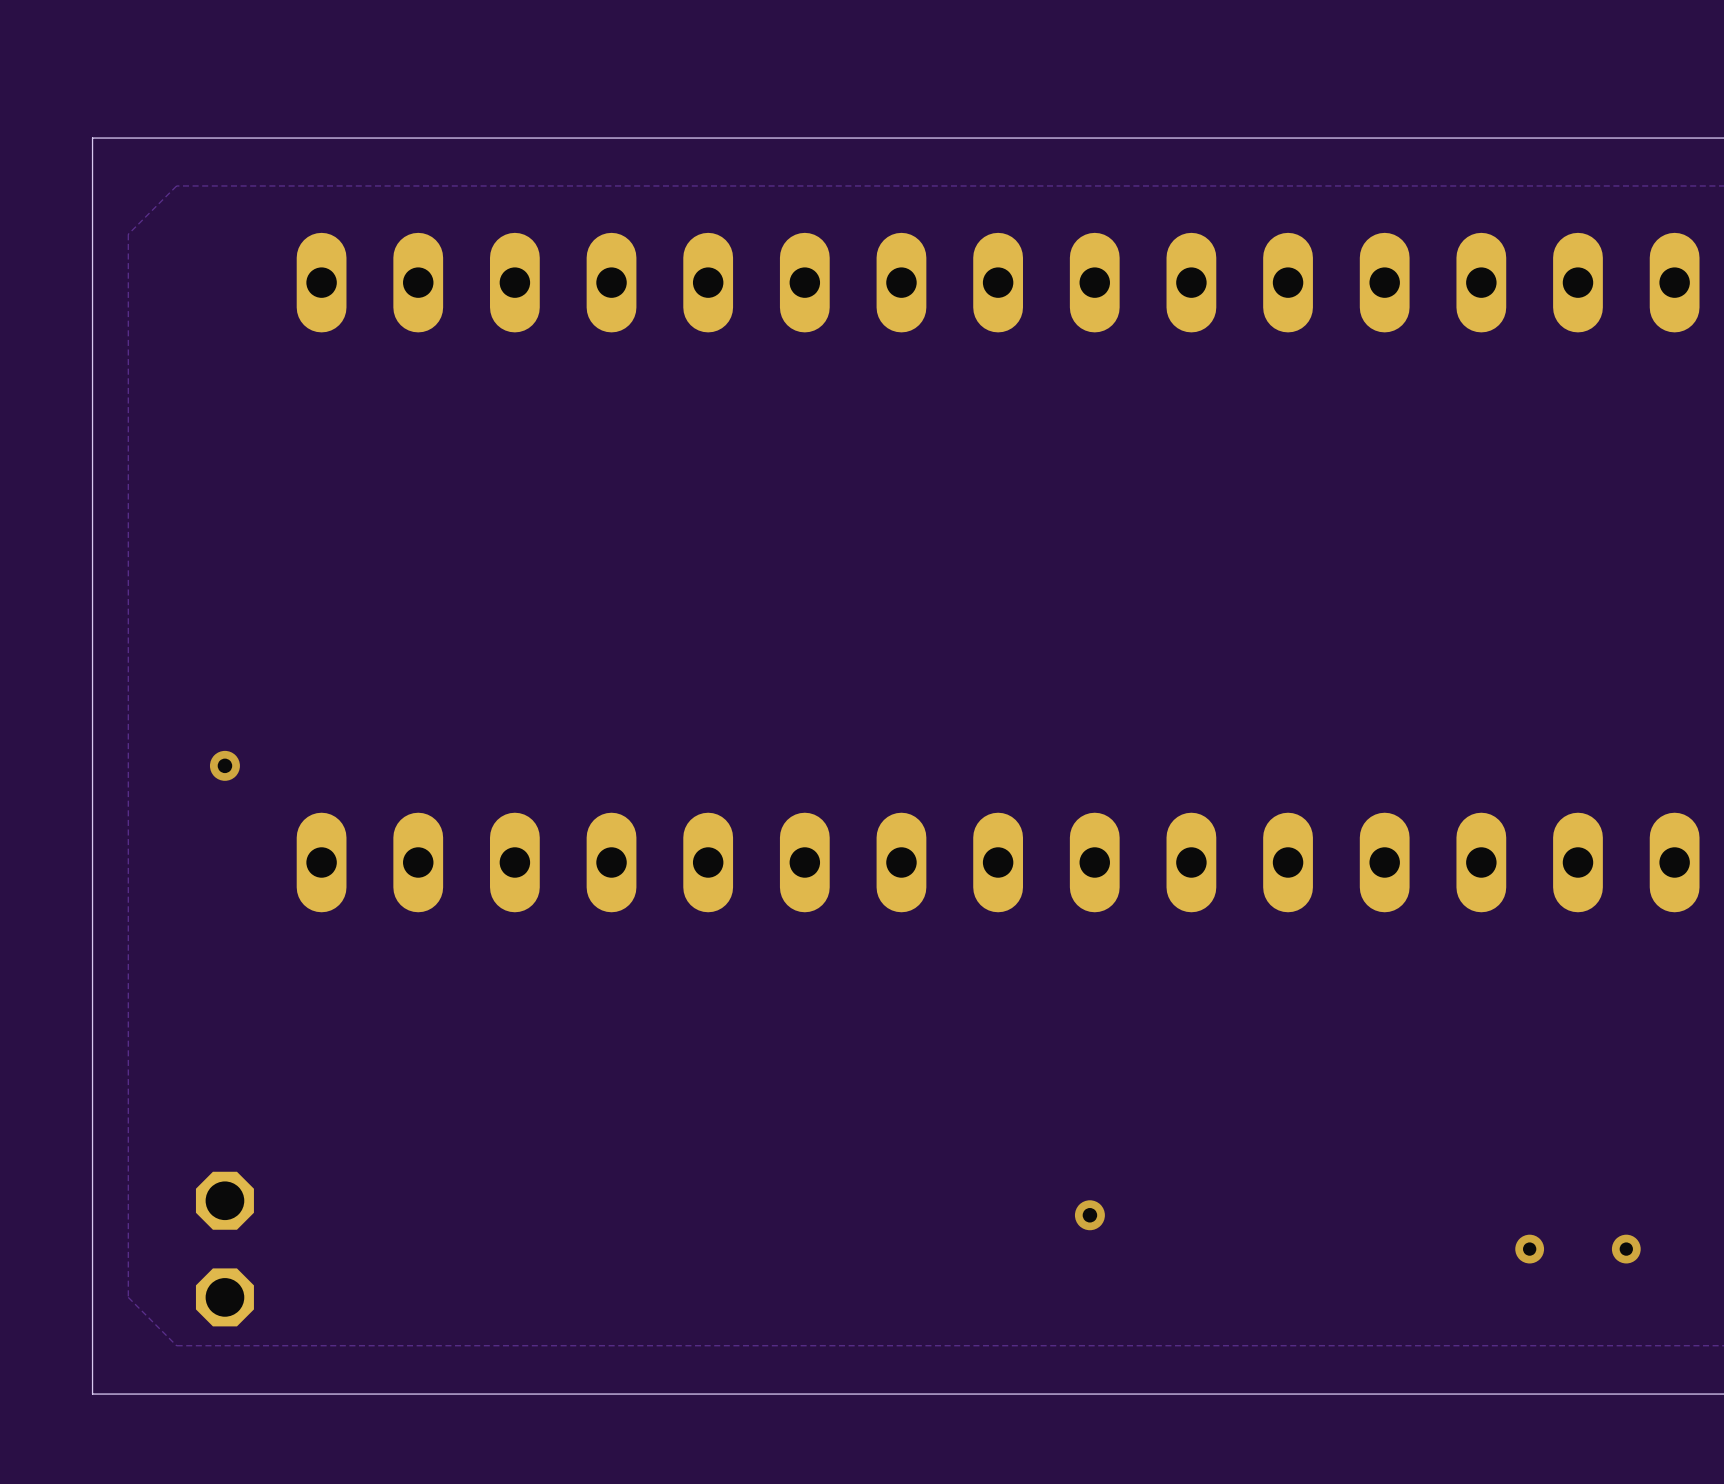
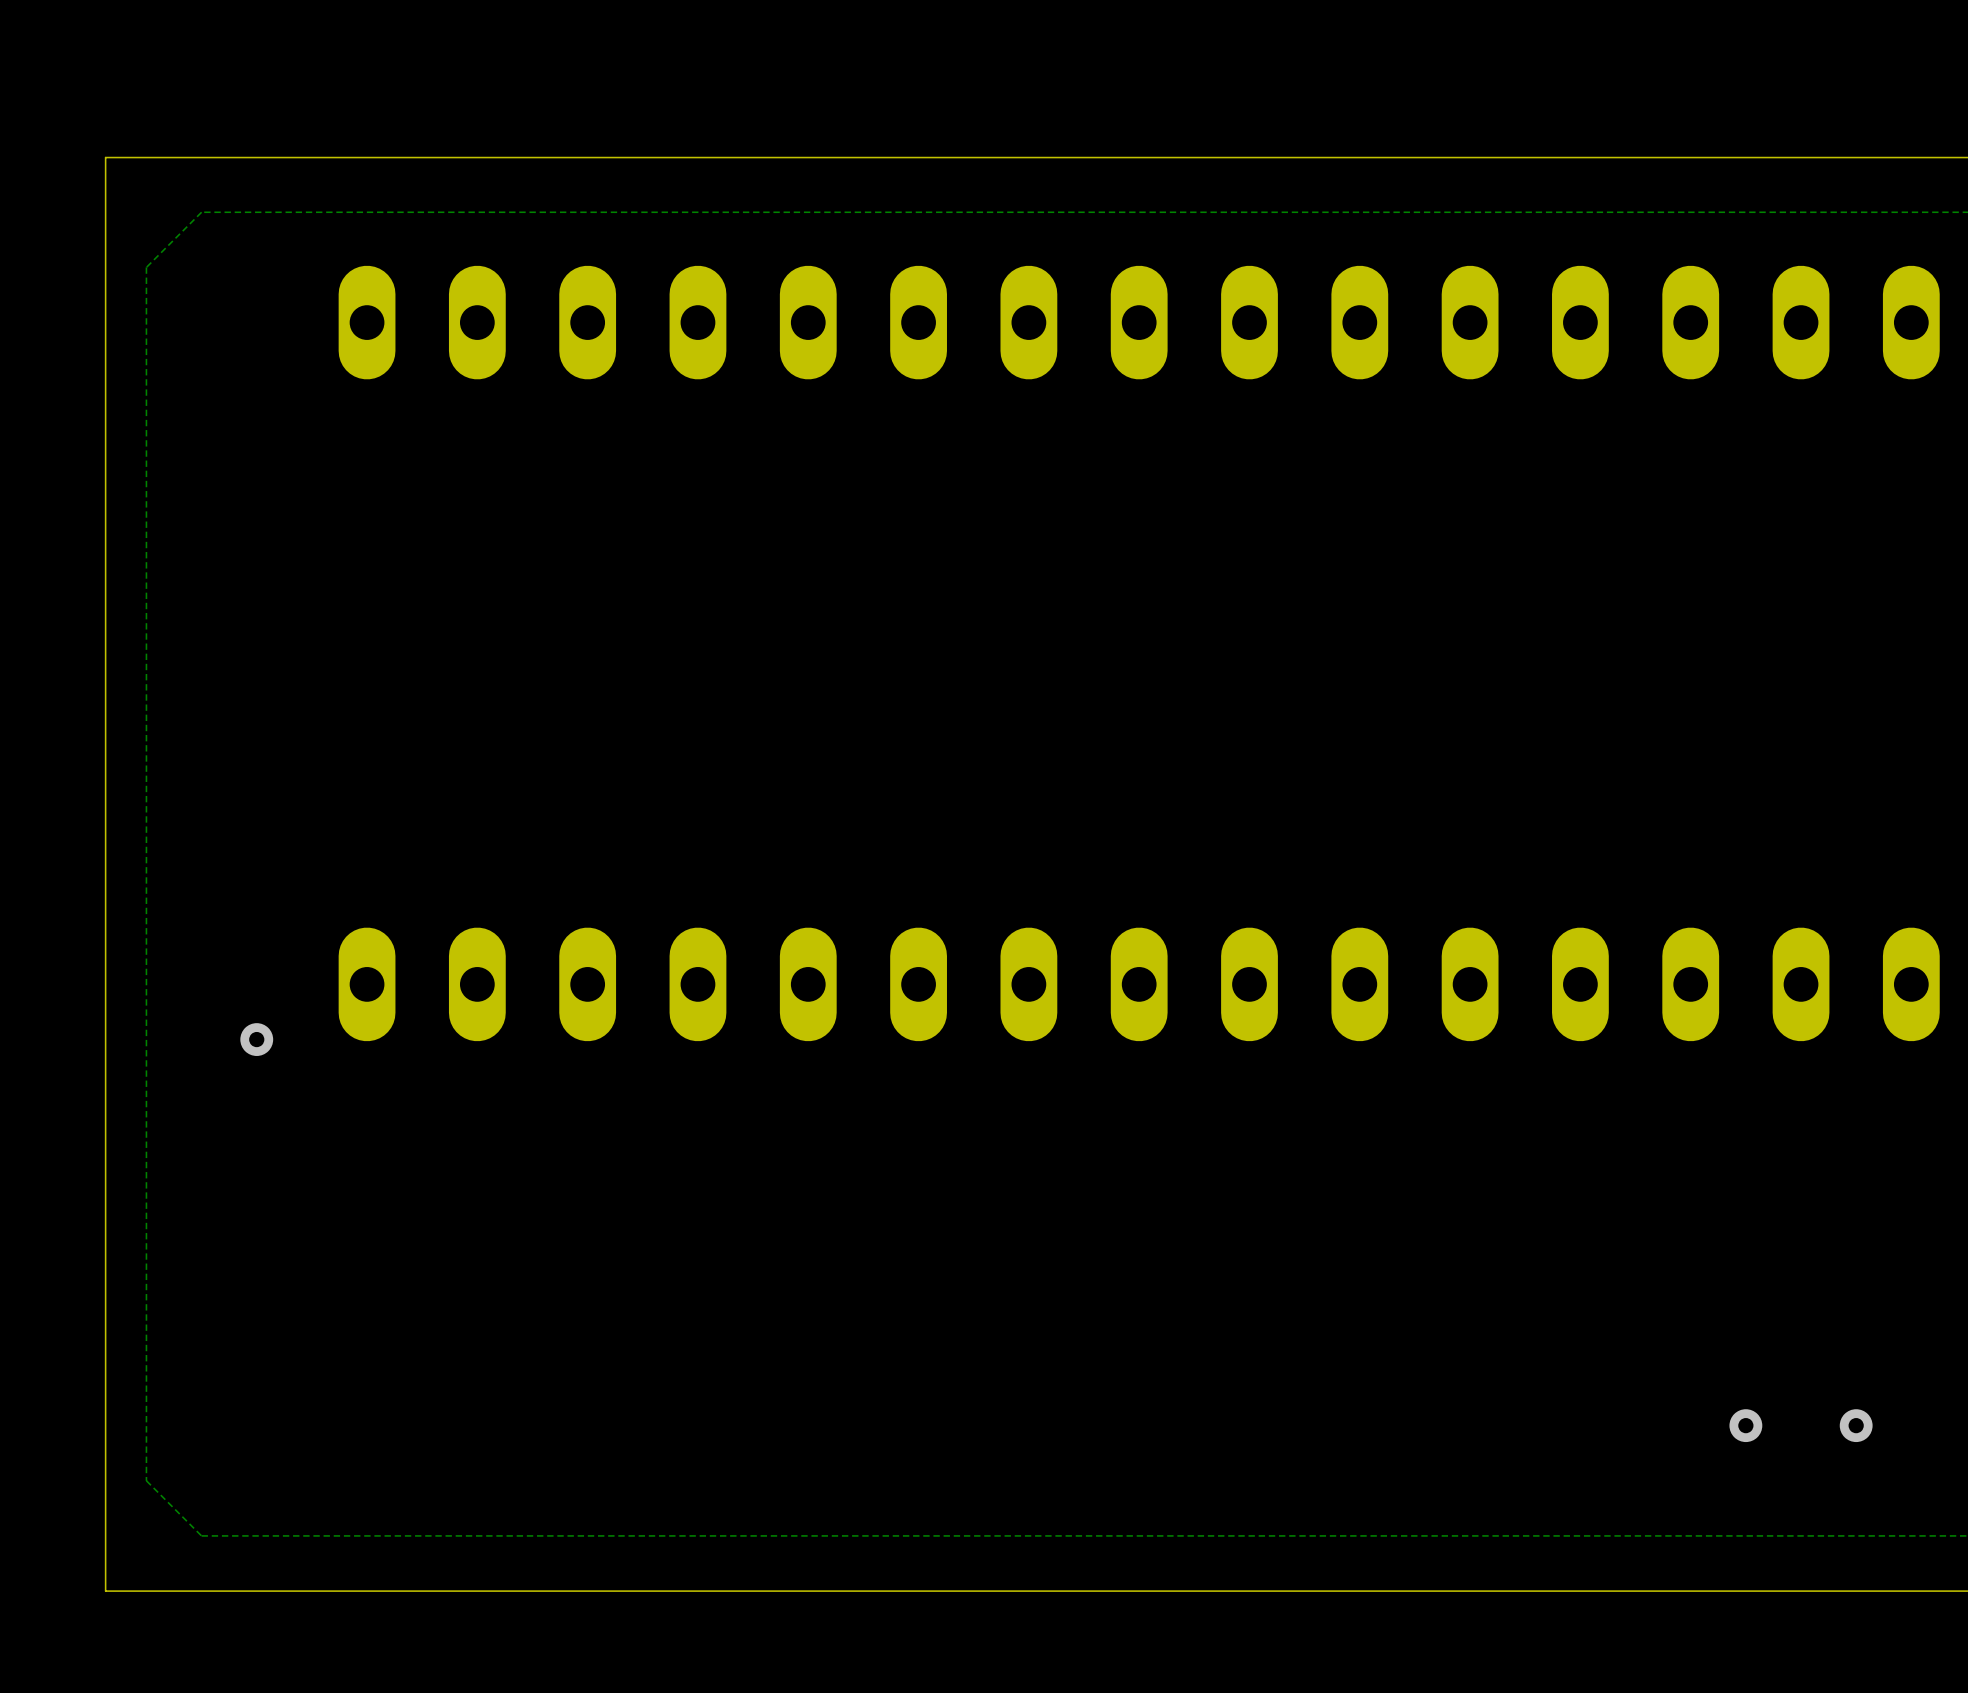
via: (224, 765) -> none
via: none -> (256, 1039)
via: (1089, 1215) -> none
part: (224, 1249) -> none

